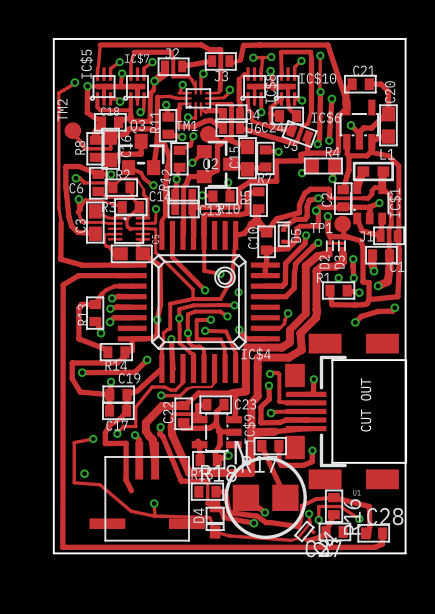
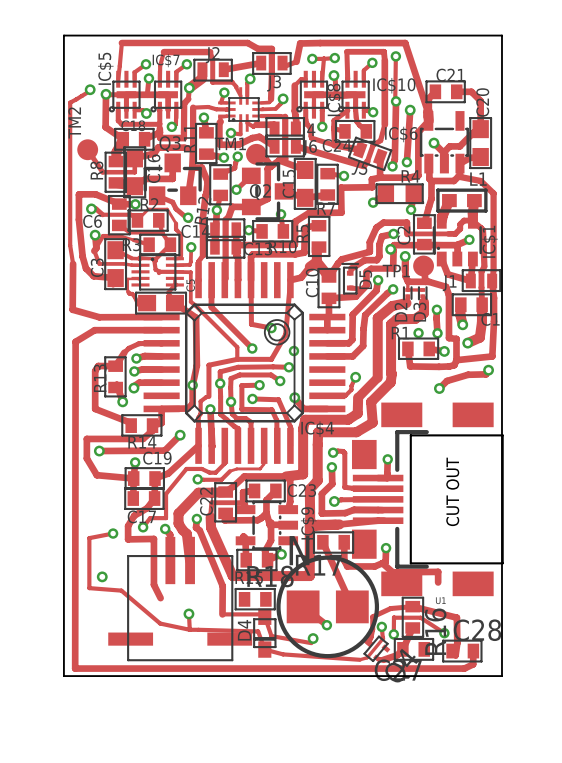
track: none -> (382, 563) (392, 572) (438, 571) (438, 582)
track: (181, 481) (207, 481) (207, 503) (221, 509) (224, 517) (253, 523) -> (222, 586) (222, 614) (262, 614) (271, 636) (311, 643)
track: (215, 491) (225, 491) (228, 512) (257, 516) (265, 522) (298, 526) -> none

